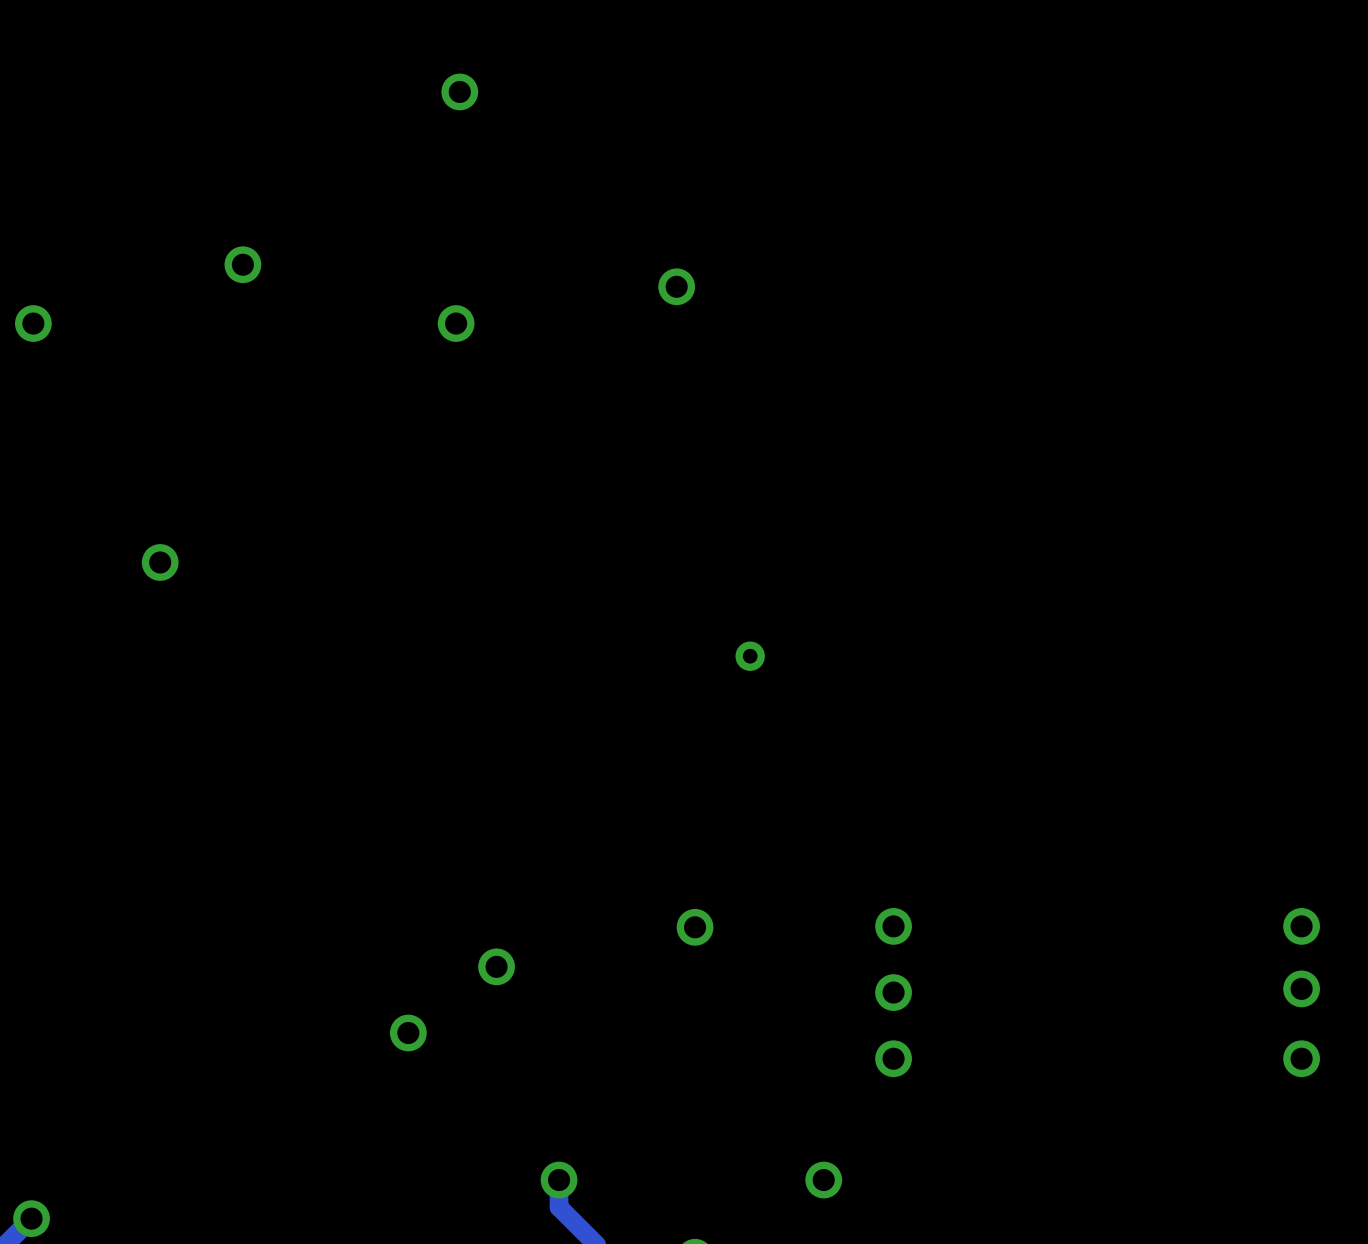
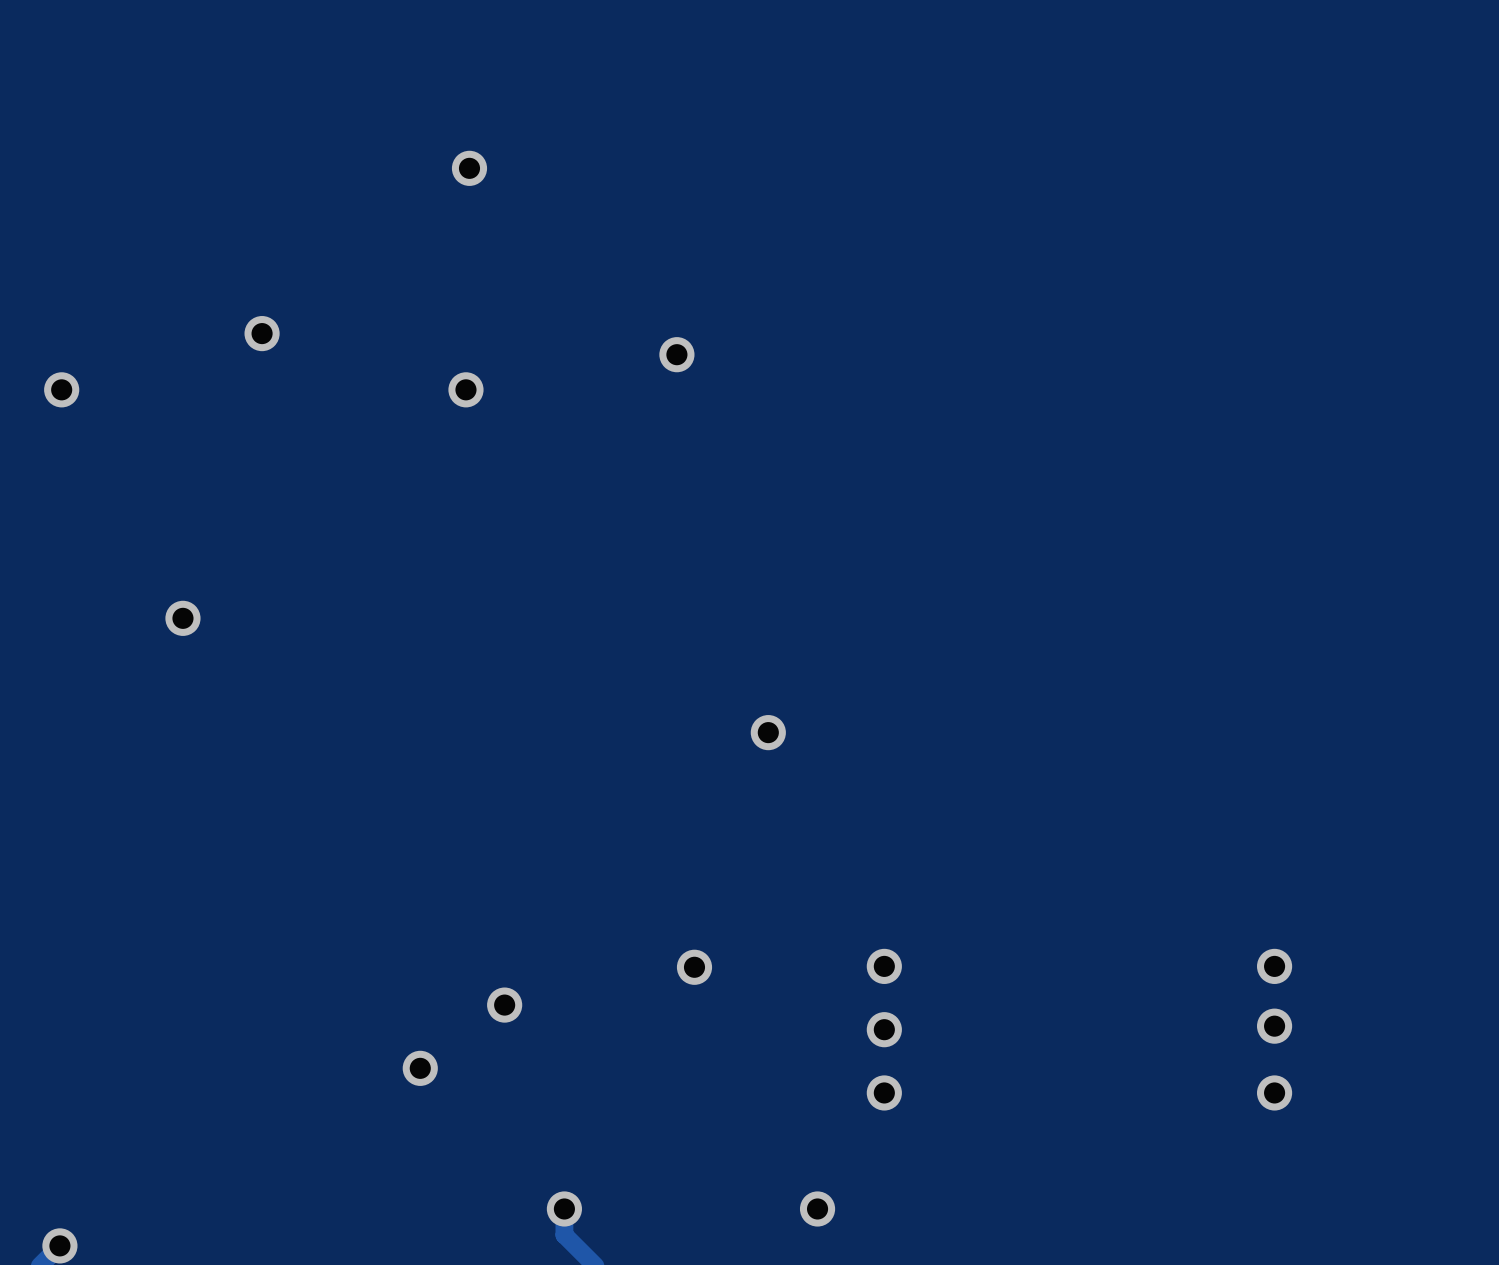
via position: (750, 656) -> (768, 732)

